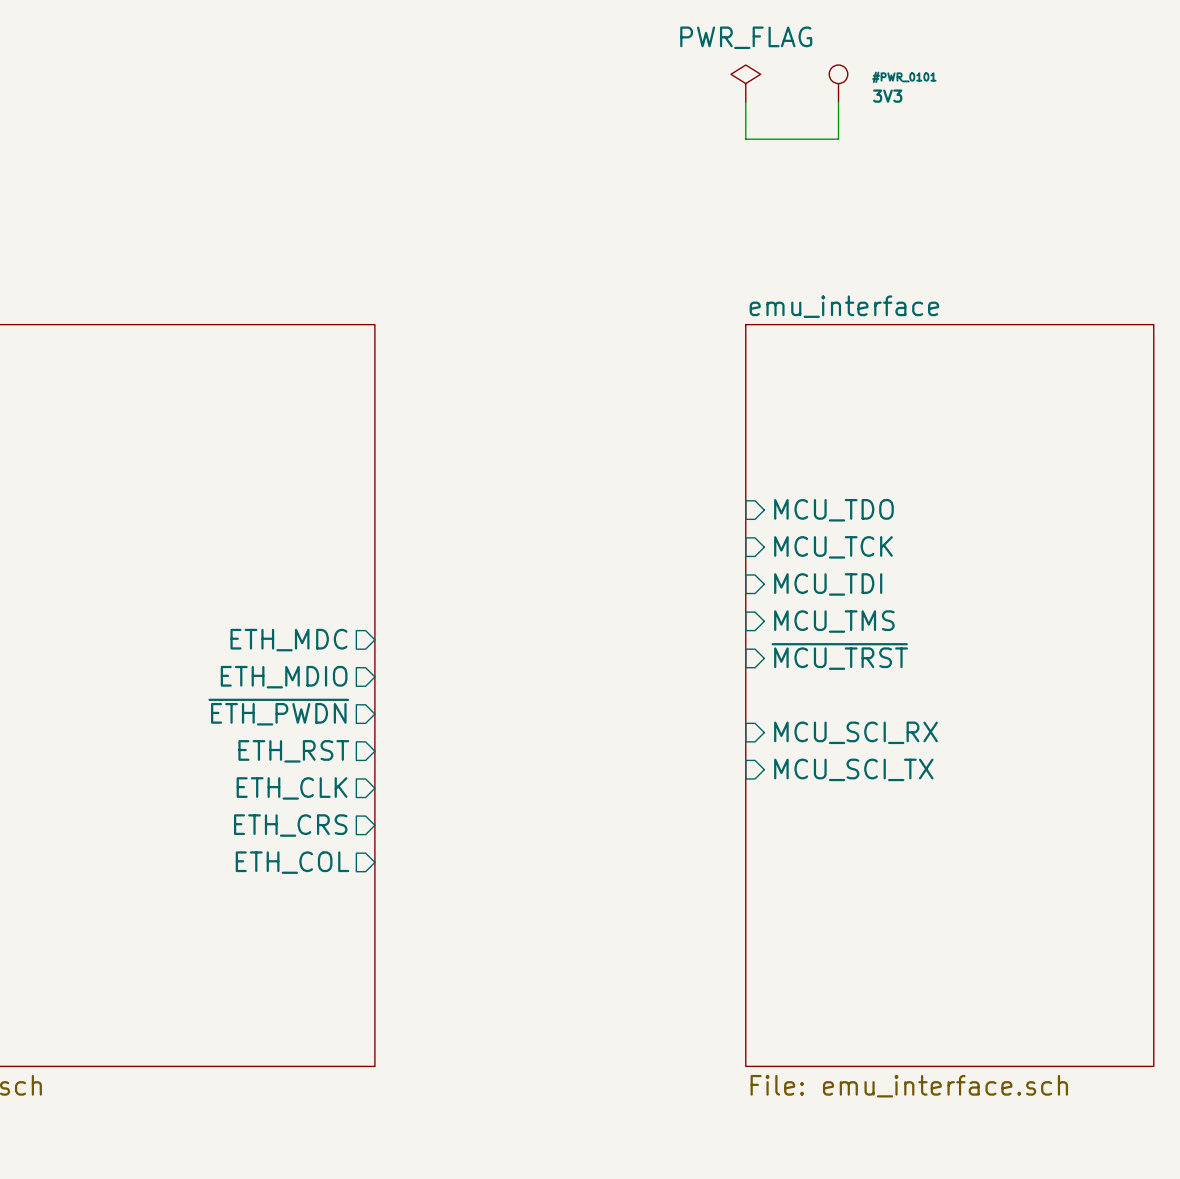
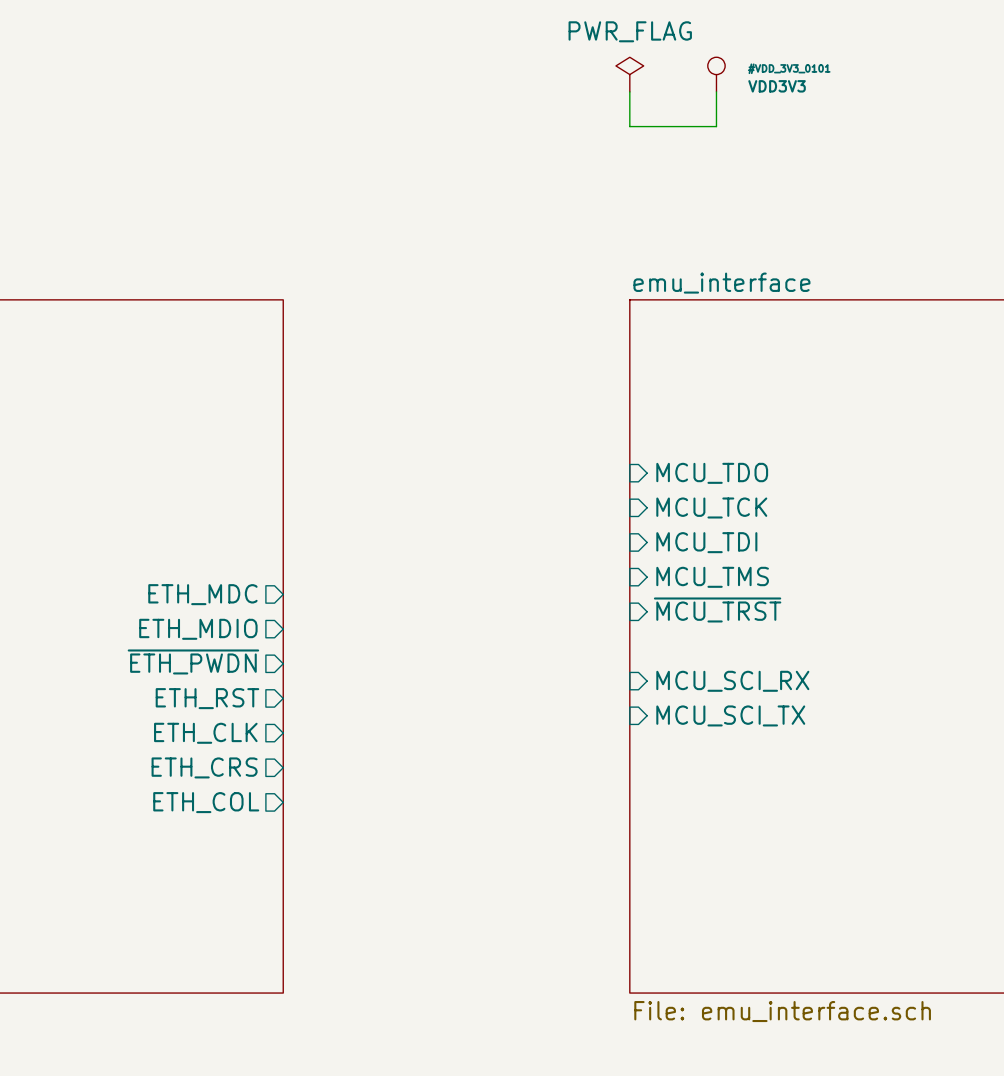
power symbol: 3V3 (838, 83) -> VDD3V3 (716, 74)

